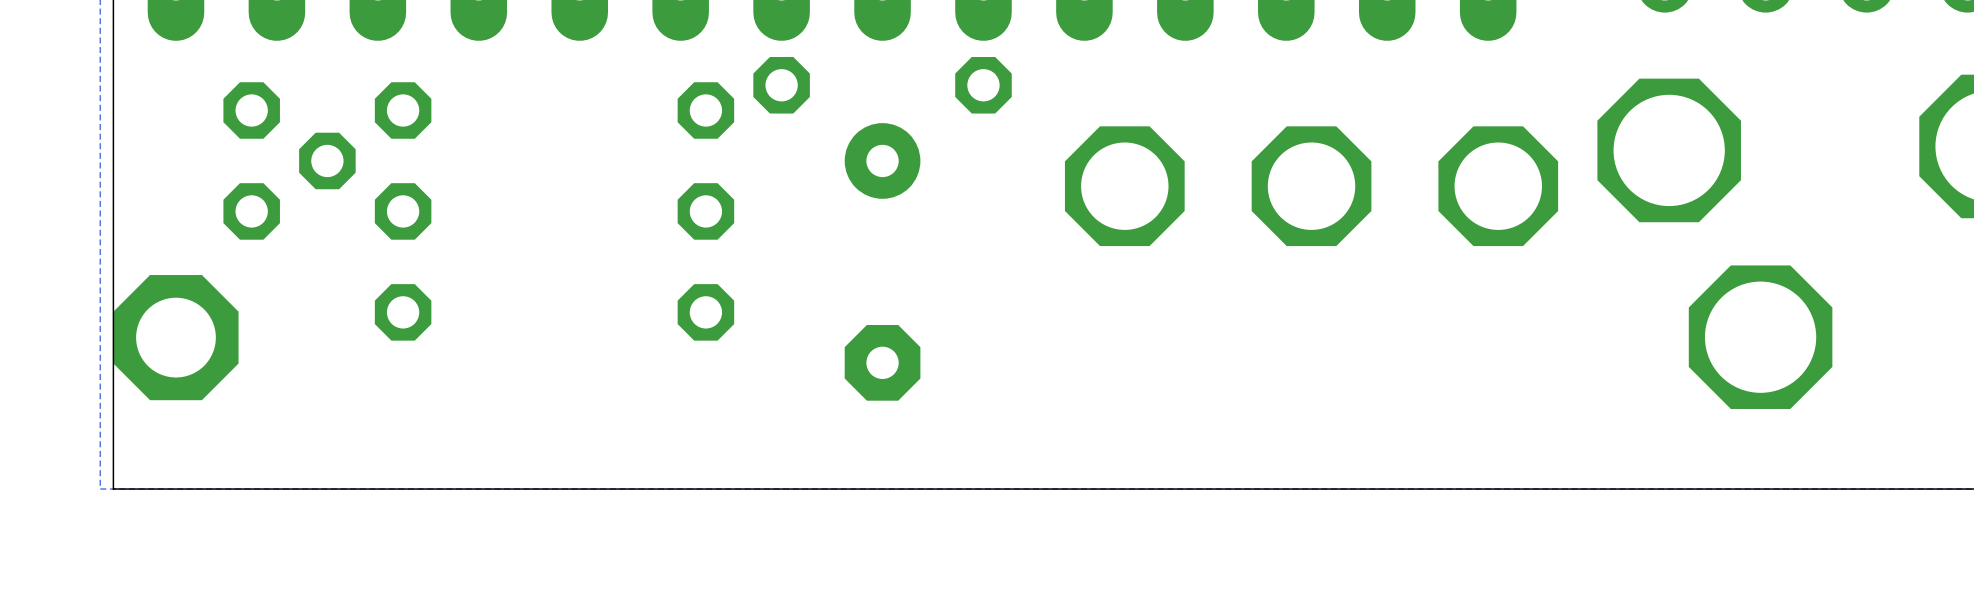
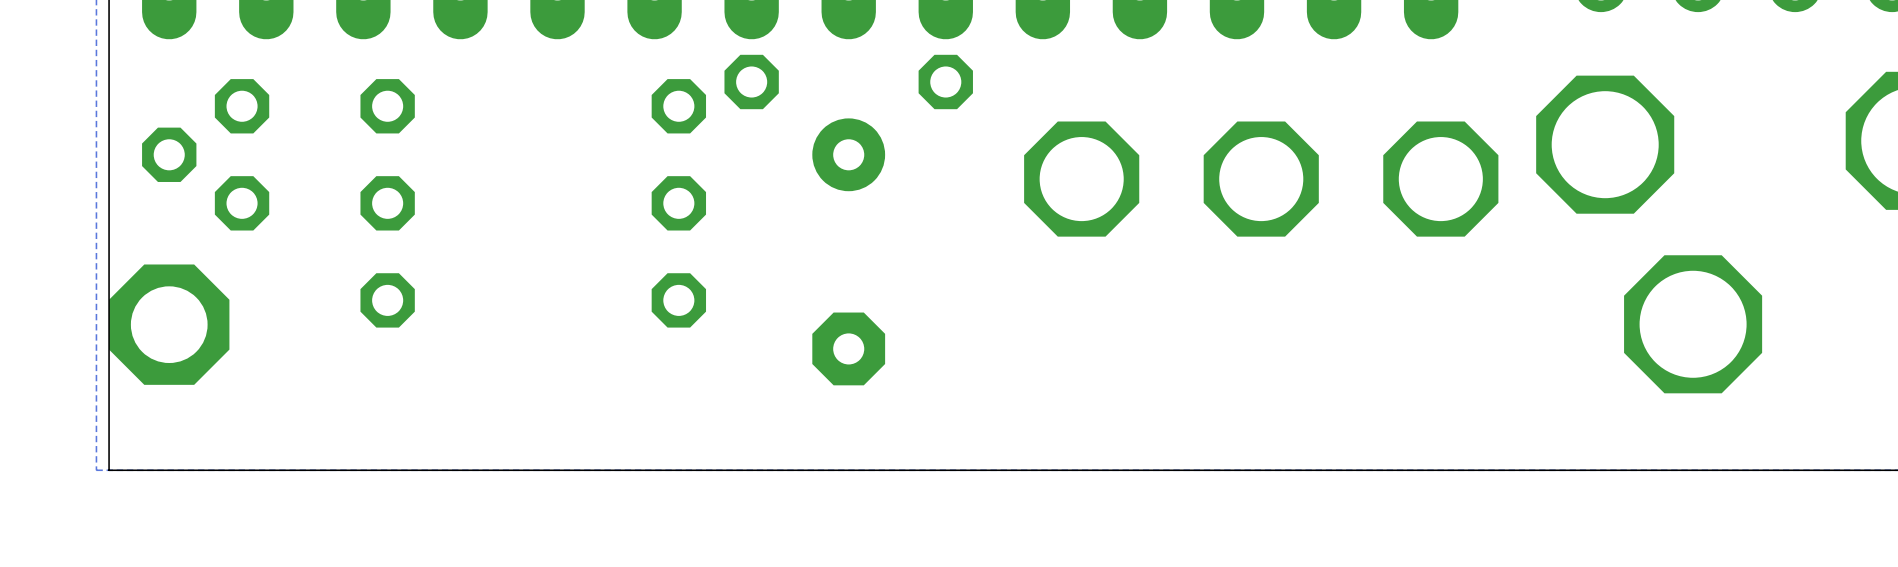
part rotation: 0° (289, 160) -> 180° (205, 154)

